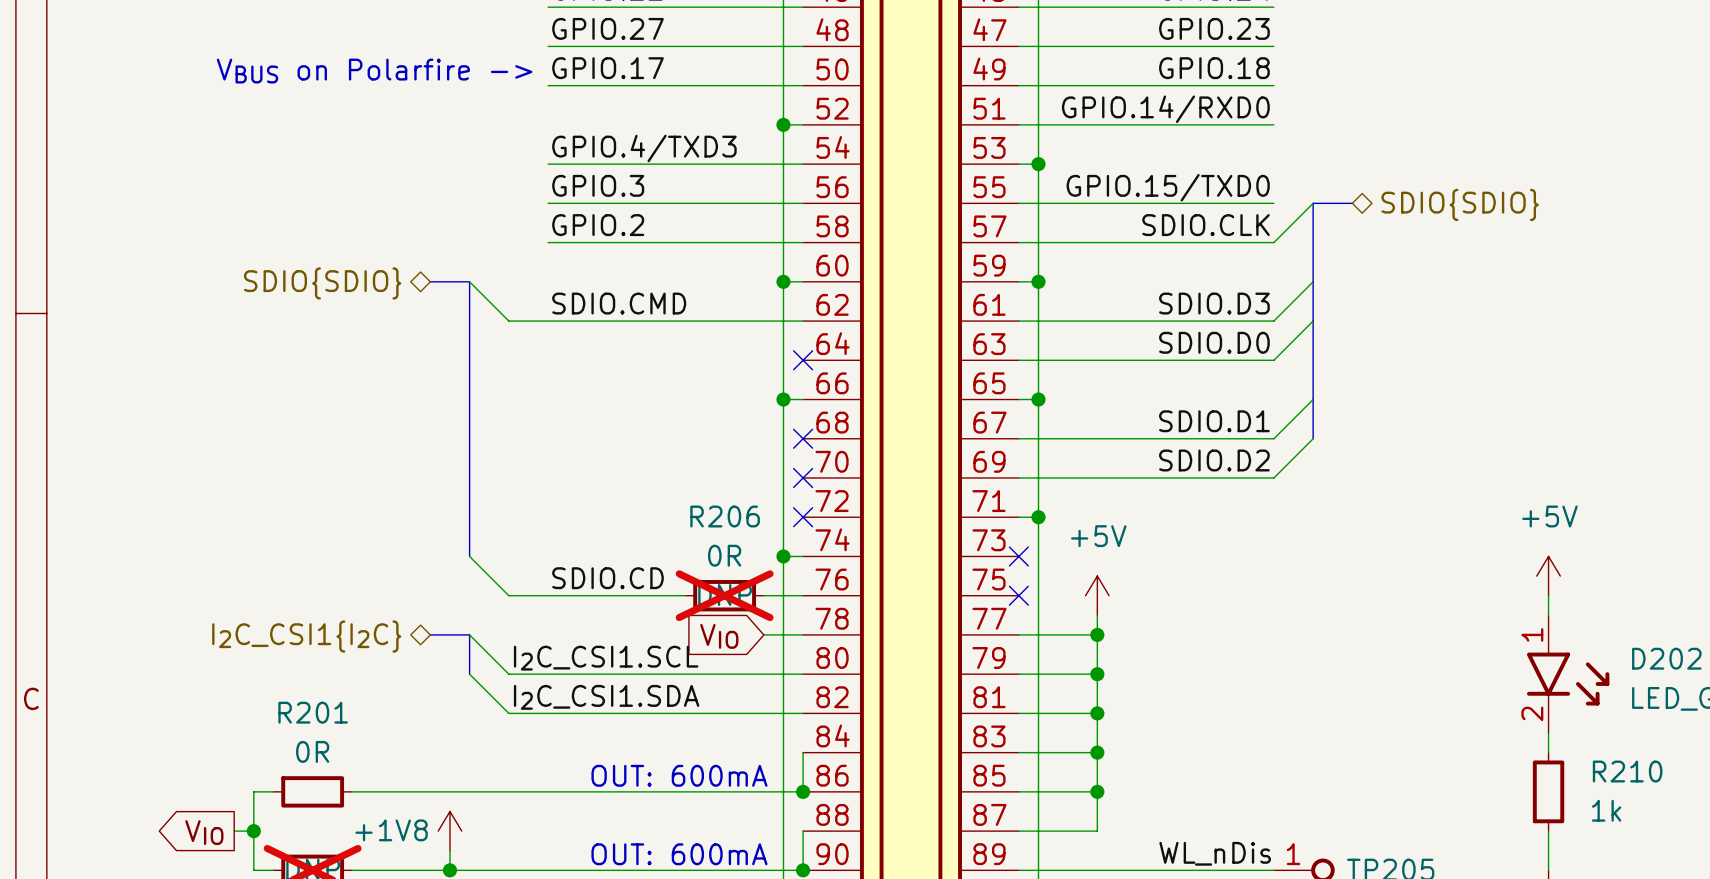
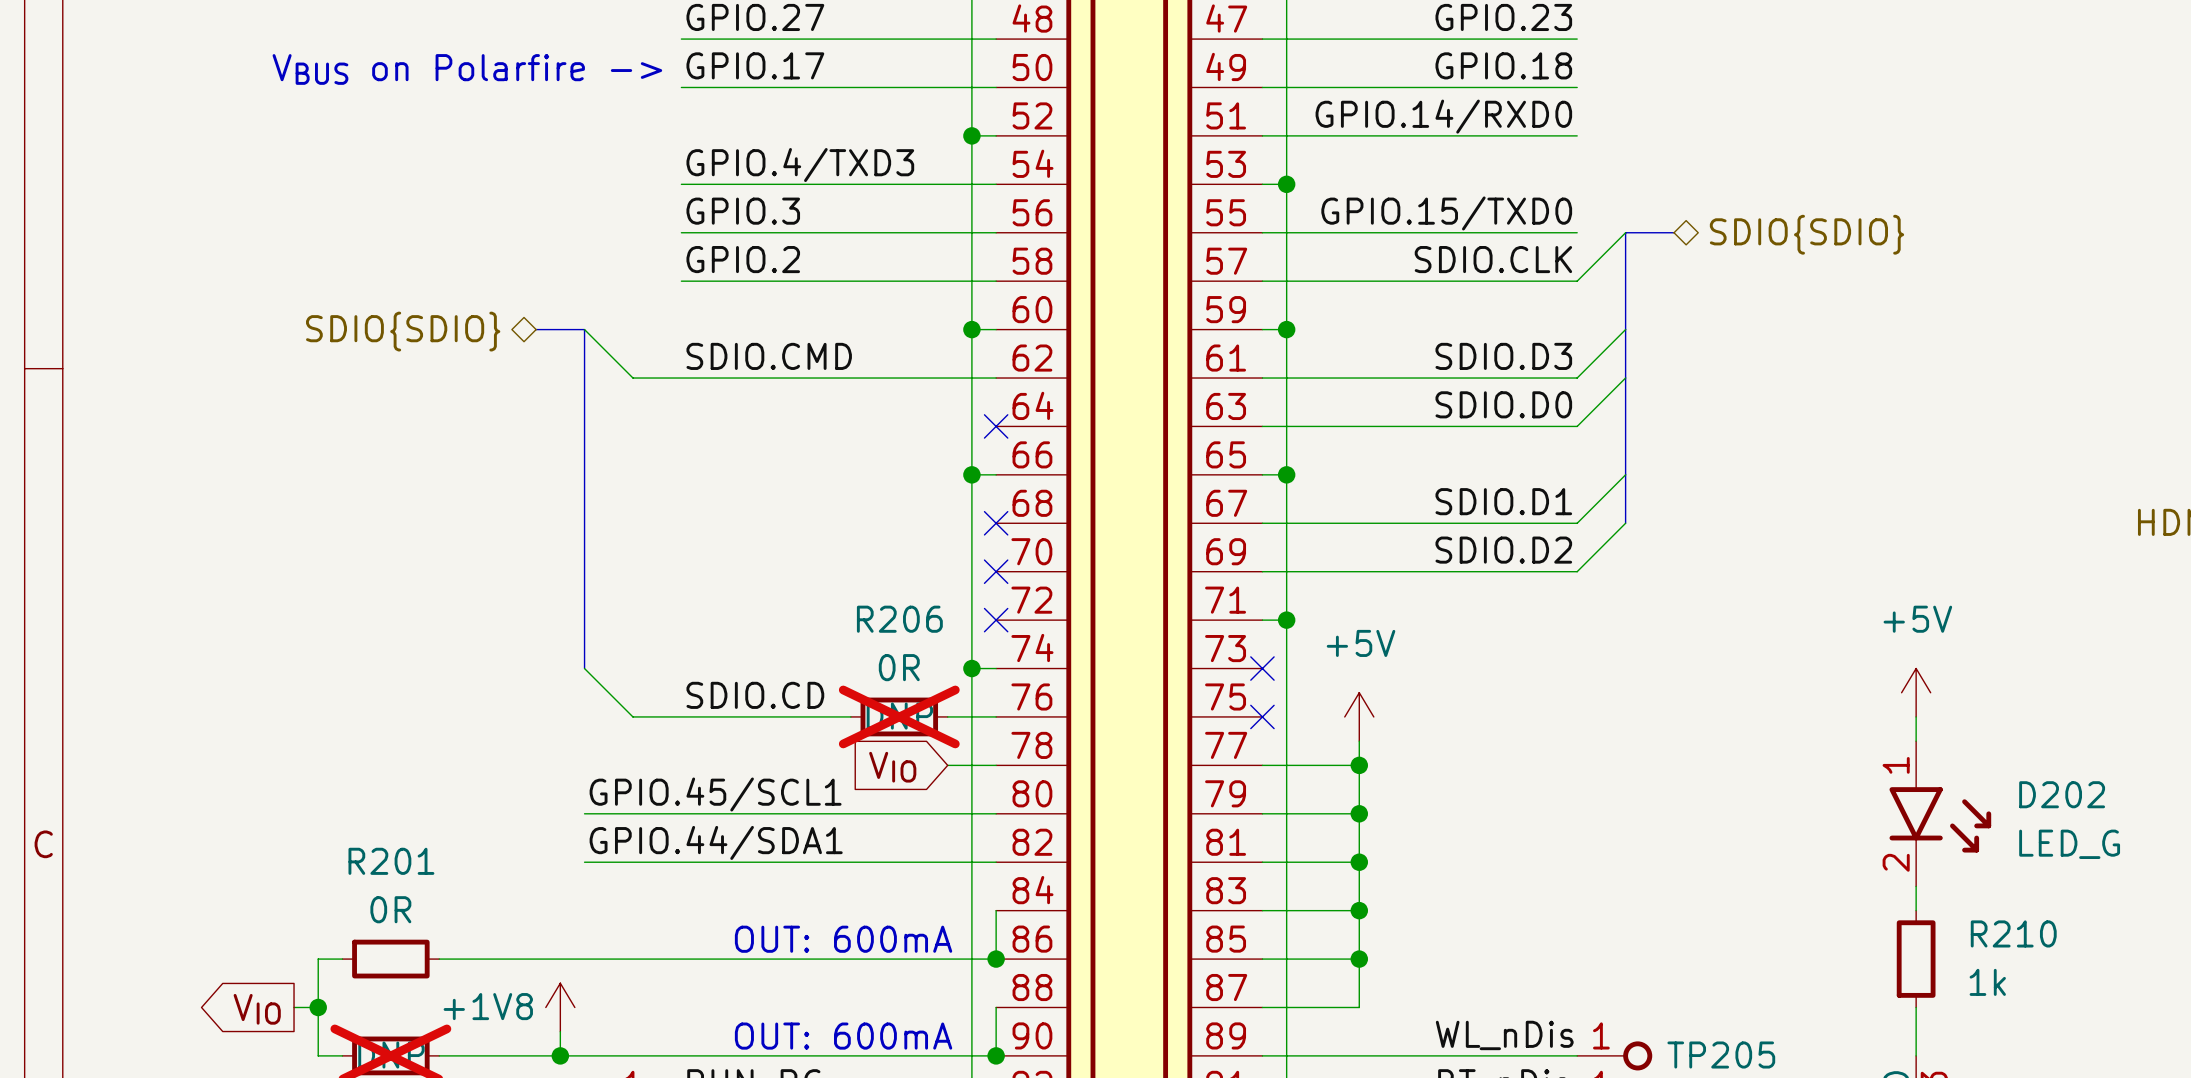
bus: (430, 634) (469, 634) (469, 674) -> none
wire: (469, 634) (508, 674) -> (584, 813) (632, 813)
hierarchical label: I2C_CSI1{I2C} (306, 636) -> none
label: none -> GPIO.45/SCL1 (715, 794)
label: I2C_CSI1.SCL (606, 658) -> none
wire: (469, 674) (508, 713) -> (584, 862) (632, 862)
label: none -> GPIO.44/SDA1 (716, 842)
label: I2C_CSI1.SDA (606, 697) -> none

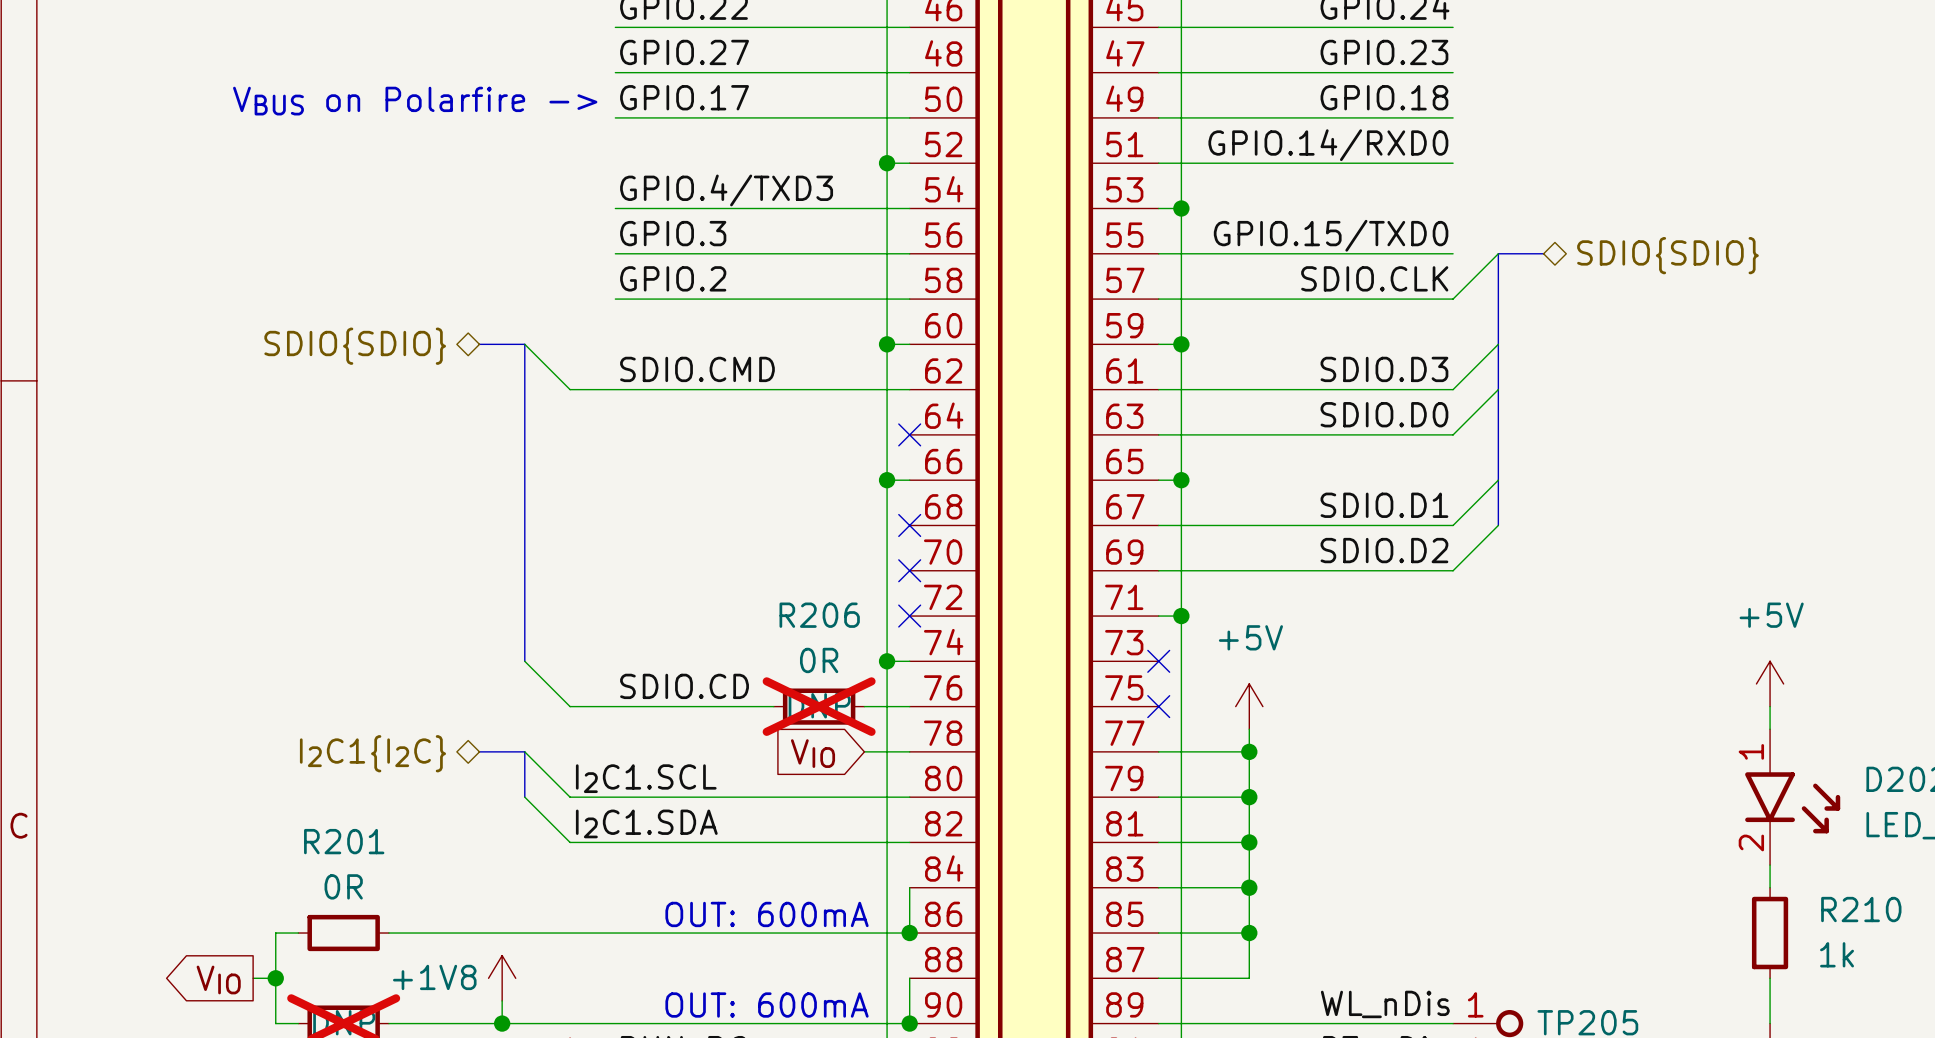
bus: none -> (479, 751) (524, 751) (524, 797)
hierarchical label: none -> I2C1{I2C} (372, 753)
label: none -> I2C1.SCL (646, 778)
label: GPIO.45/SCL1 (715, 794) -> none
wire: (584, 813) (632, 813) -> (524, 751) (570, 797)
label: none -> I2C1.SDA (646, 823)
label: GPIO.44/SDA1 (716, 842) -> none
wire: (584, 862) (632, 862) -> (524, 797) (570, 842)

